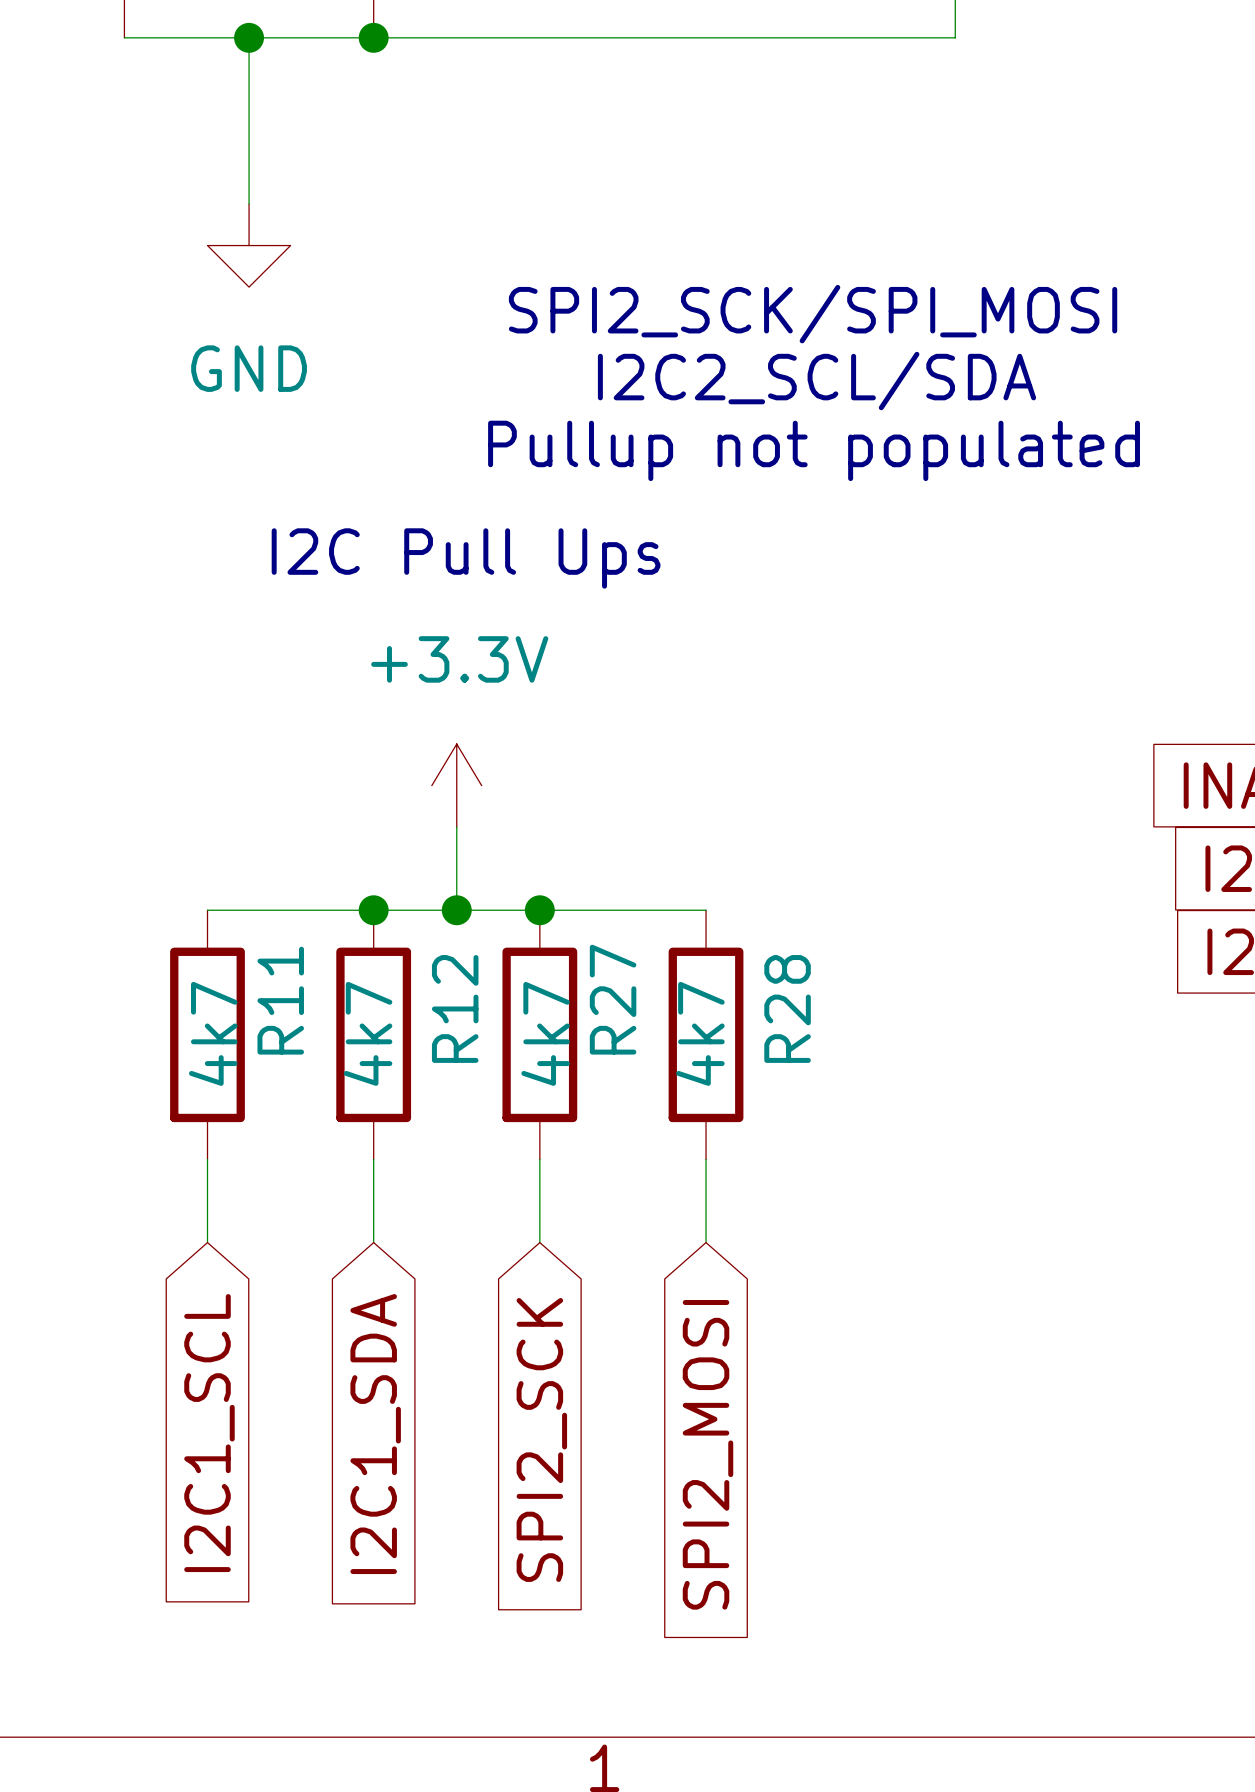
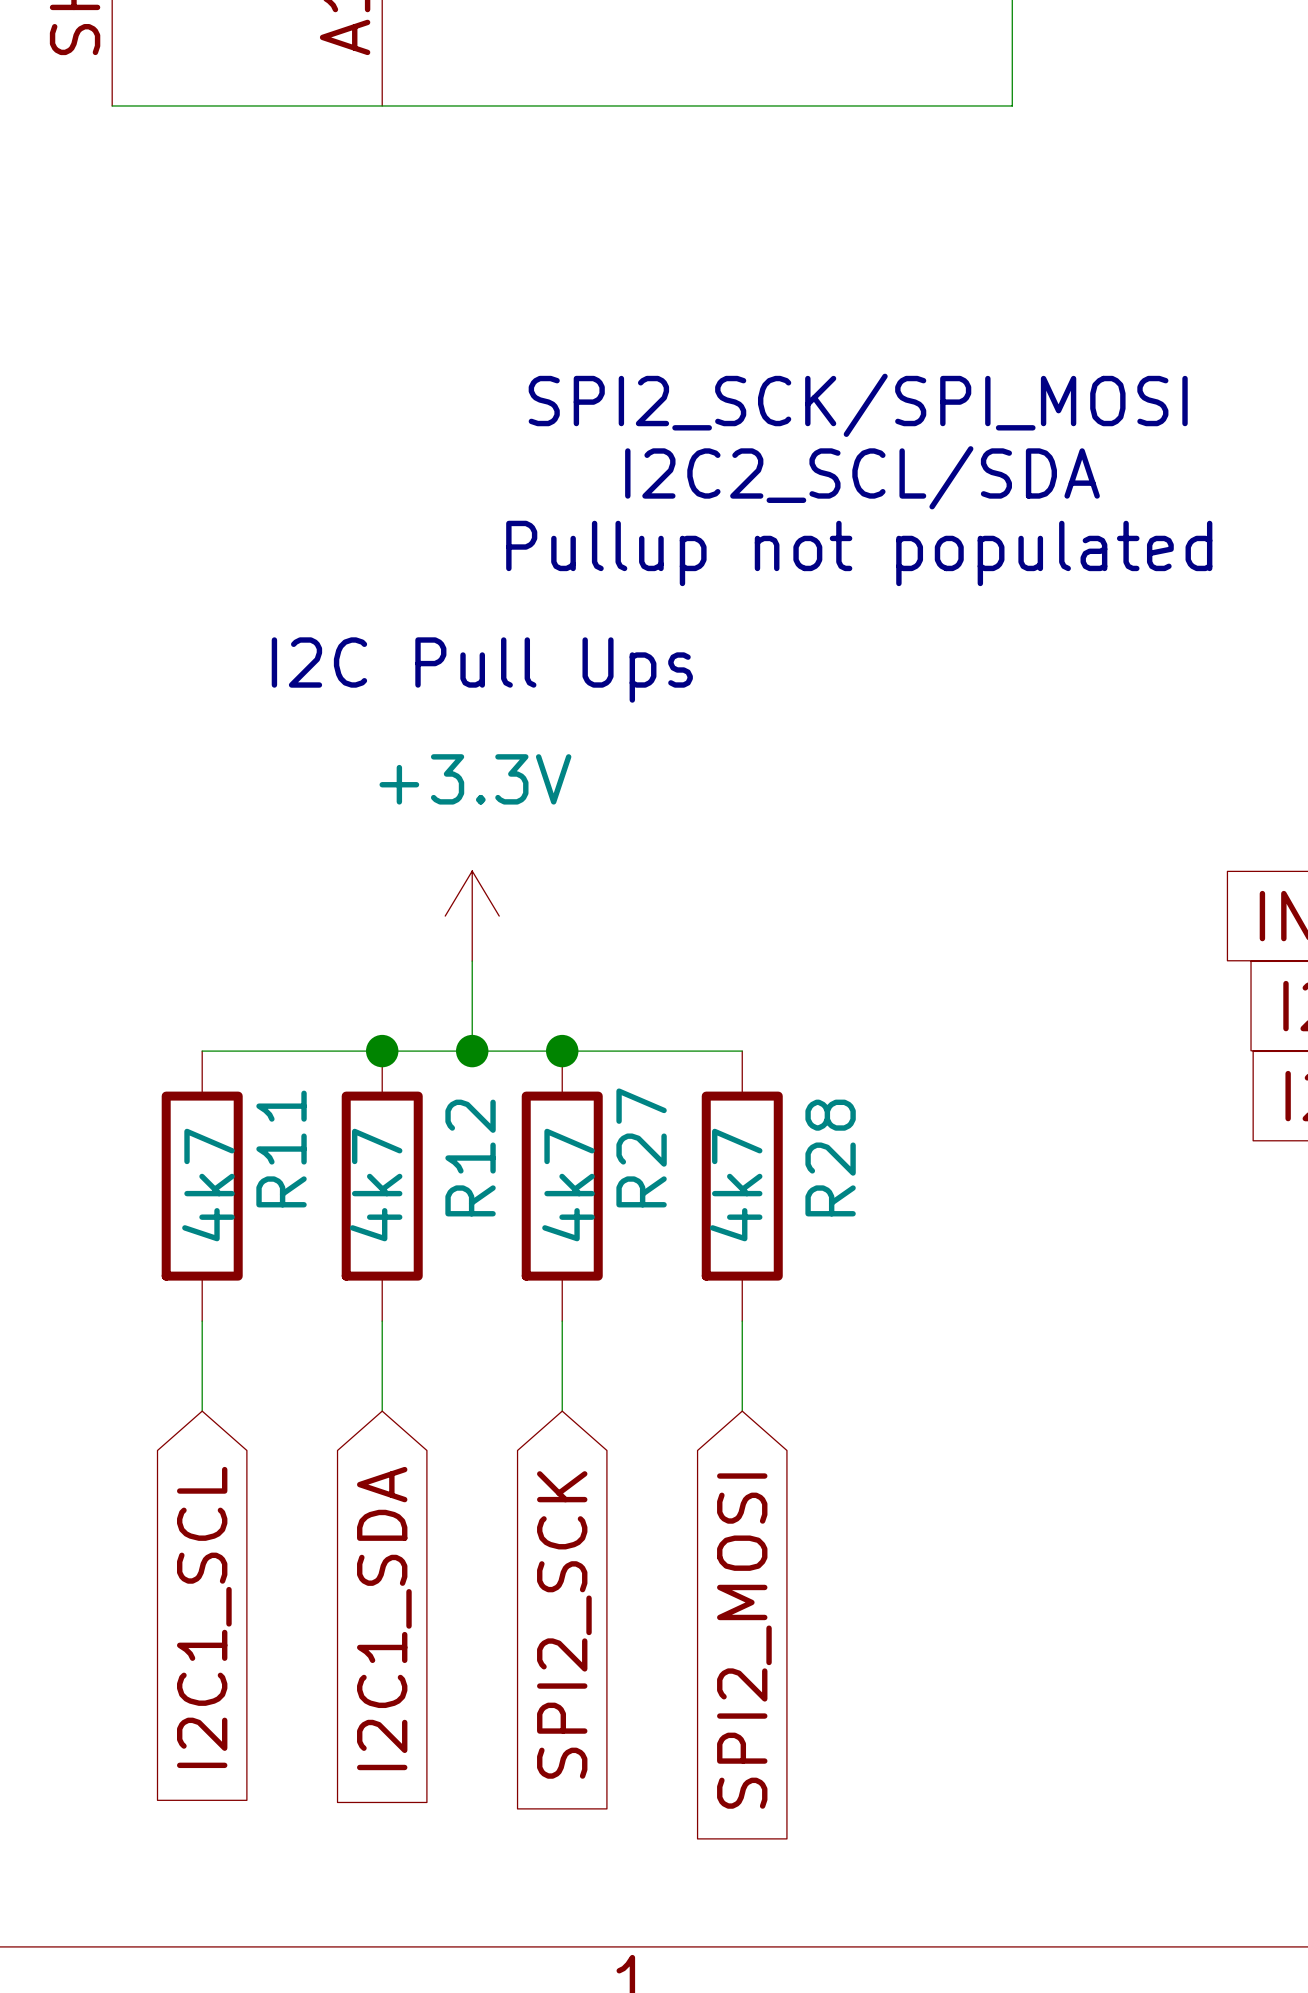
wire: (249, 37) (249, 204) -> none
junction: (249, 37) -> none
junction: (373, 37) -> none
power symbol: GND (249, 245) -> none

